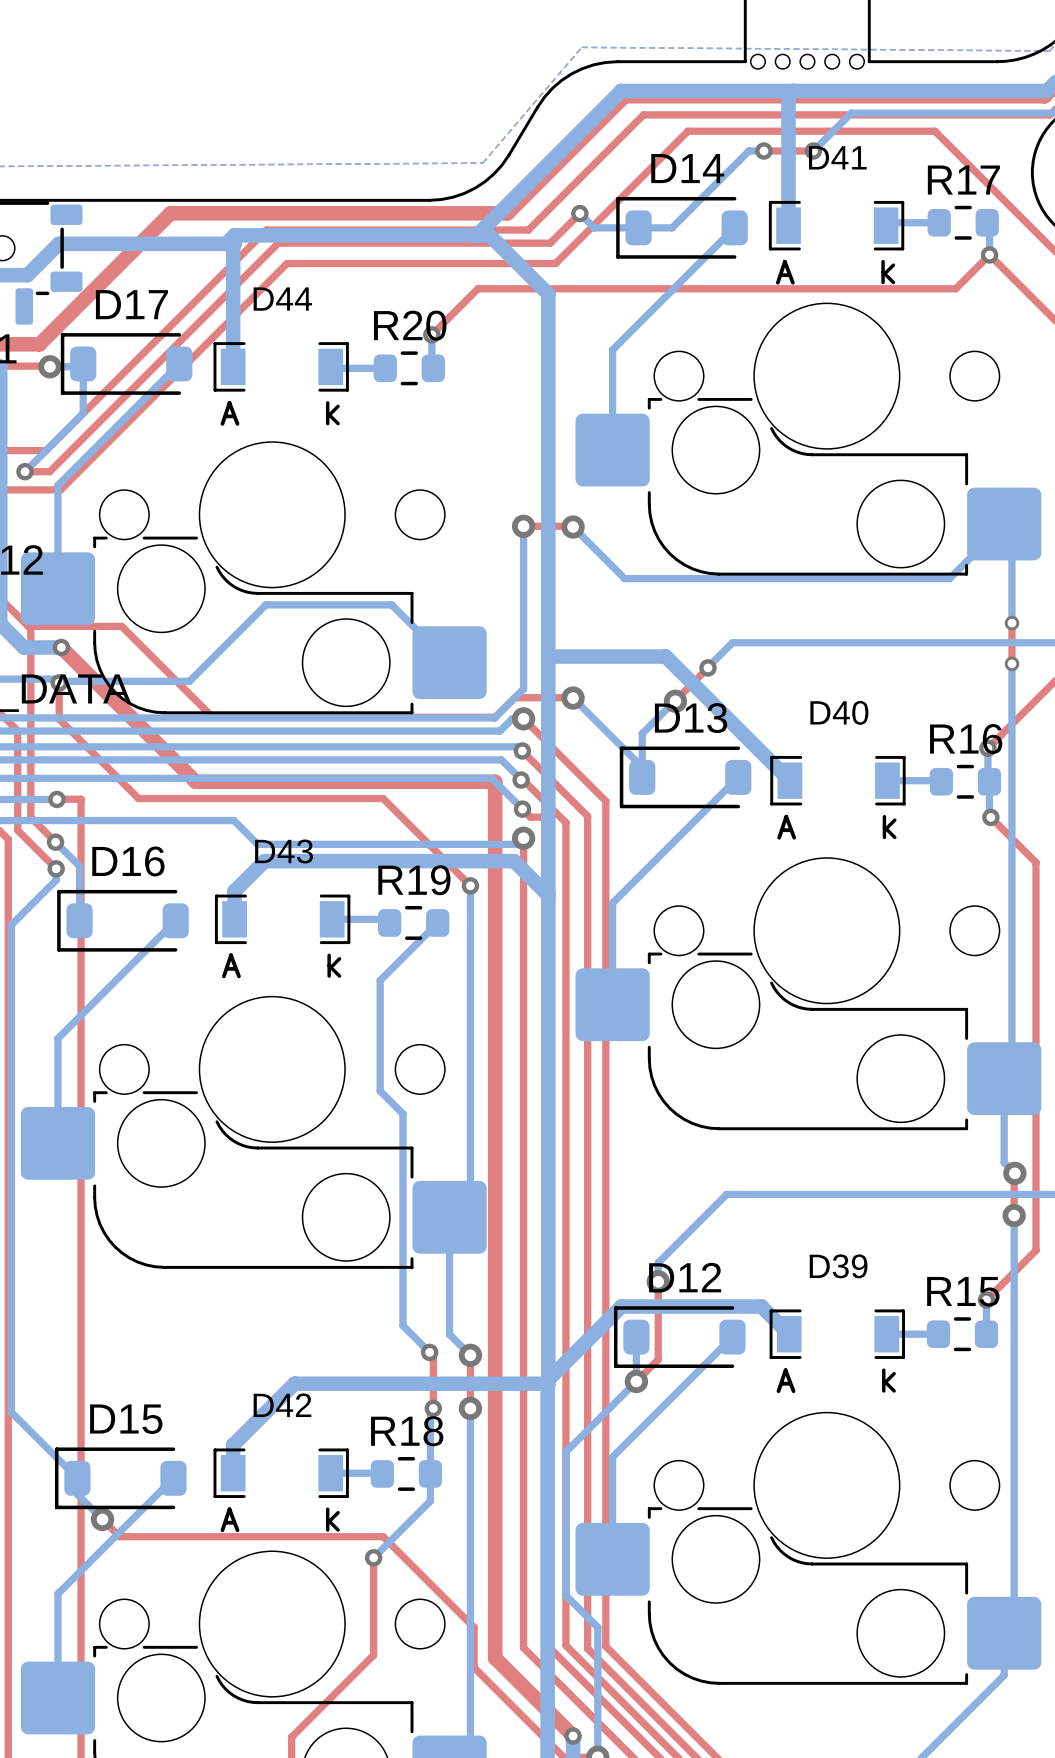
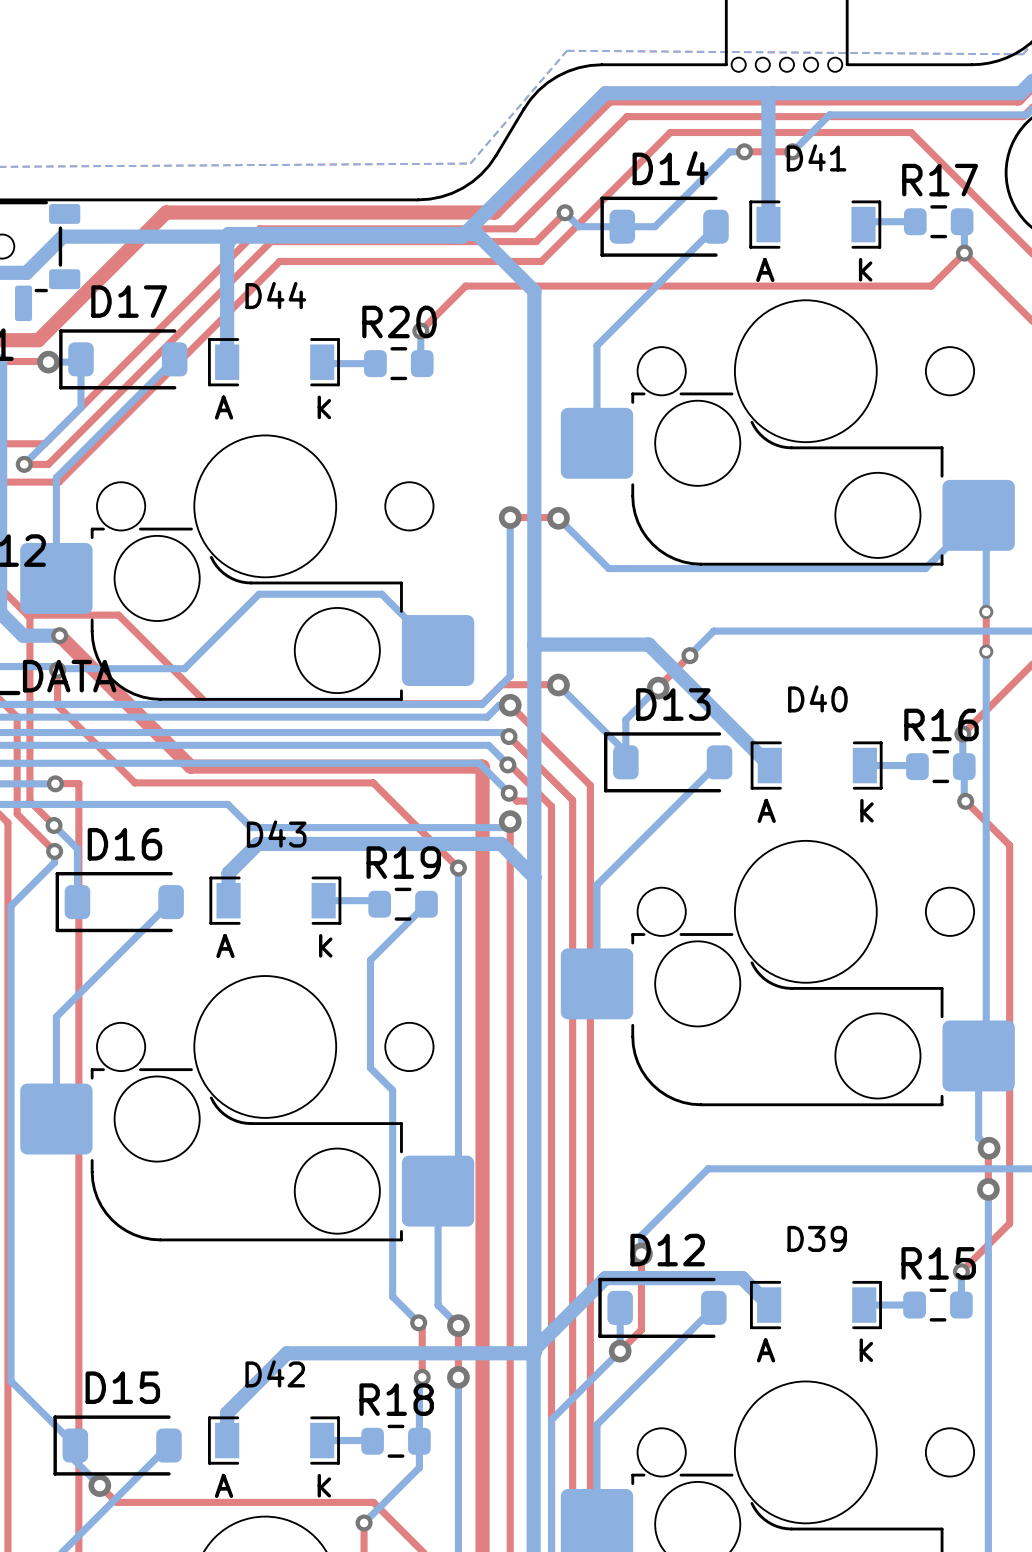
bottom track: (234, 235) (226, 243) (58, 243) -> (464, 234) (461, 236) (62, 236) (57, 242)

